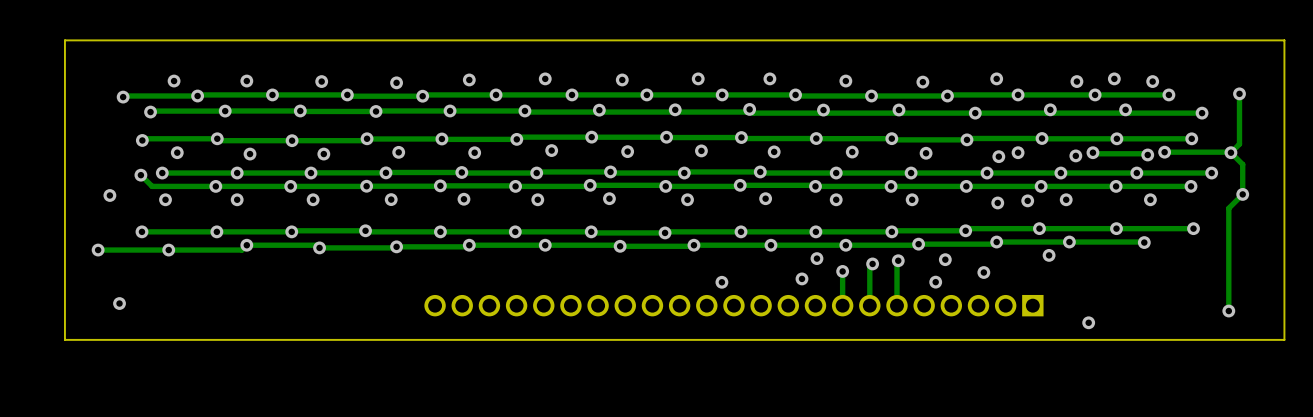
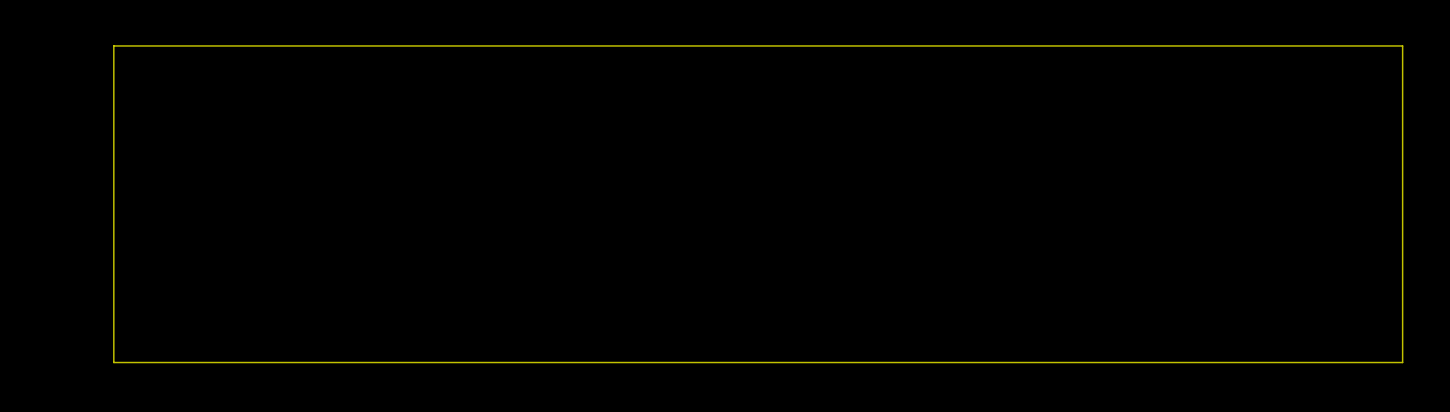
via: (545, 78) -> none
via: (698, 78) -> none
via: (769, 78) -> none
via: (996, 78) -> none
via: (1114, 78) -> none
via: (469, 79) -> none
via: (622, 79) -> none
via: (174, 81) -> none
via: (246, 81) -> none
via: (321, 81) -> none
via: (845, 81) -> none
via: (1076, 81) -> none
via: (1152, 81) -> none
via: (396, 82) -> none
via: (922, 82) -> none
track: (1239, 93) (1239, 144) (1230, 152) -> none
via: (1239, 93) -> none
via: (272, 94) -> none
via: (347, 94) -> none
via: (496, 94) -> none
via: (572, 94) -> none
via: (646, 94) -> none
via: (722, 94) -> none
via: (795, 94) -> none
via: (1018, 94) -> none
via: (1095, 94) -> none
track: (1168, 94) (198, 94) (123, 97) -> none
via: (1168, 94) -> none
via: (197, 96) -> none
via: (422, 96) -> none
via: (871, 96) -> none
via: (947, 96) -> none
via: (123, 97) -> none
via: (675, 109) -> none
via: (749, 109) -> none
via: (898, 109) -> none
via: (1050, 109) -> none
via: (1125, 109) -> none
via: (300, 110) -> none
via: (450, 110) -> none
via: (524, 110) -> none
via: (599, 110) -> none
via: (823, 110) -> none
via: (225, 111) -> none
via: (376, 111) -> none
track: (150, 112) (597, 112) (599, 110) (601, 112) (673, 112) (675, 109) (677, 112) (747, 112) (749, 109) (753, 113) (820, 113) (823, 110) (826, 113) (895, 113) (898, 109) (902, 113) (1047, 113) (1050, 109) (1053, 113) (1122, 113) (1125, 109) (1128, 113) (1202, 113) -> none
via: (150, 112) -> none
via: (975, 113) -> none
via: (1202, 113) -> none
track: (591, 137) (519, 137) (516, 139) (367, 138) -> none
track: (591, 137) (893, 139) (1191, 138) -> none
via: (591, 137) -> none
via: (666, 137) -> none
via: (741, 137) -> none
via: (217, 138) -> none
track: (367, 138) (363, 140) (219, 140) (217, 138) (144, 138) (142, 140) -> none
via: (367, 138) -> none
via: (441, 138) -> none
via: (816, 138) -> none
via: (891, 138) -> none
via: (1042, 138) -> none
via: (1116, 138) -> none
via: (1191, 138) -> none
via: (516, 139) -> none
via: (966, 139) -> none
via: (142, 140) -> none
via: (292, 140) -> none
via: (551, 150) -> none
via: (701, 150) -> none
via: (627, 151) -> none
via: (774, 151) -> none
via: (177, 152) -> none
via: (398, 152) -> none
via: (474, 152) -> none
via: (852, 152) -> none
via: (1018, 152) -> none
track: (1092, 152) (1147, 154) -> none
via: (1092, 152) -> none
track: (1164, 152) (1230, 152) (1242, 164) (1242, 194) (1228, 208) (1228, 311) -> none
via: (1164, 152) -> none
via: (1230, 152) -> none
via: (926, 153) -> none
via: (250, 154) -> none
via: (323, 154) -> none
via: (1147, 154) -> none
via: (1075, 155) -> none
via: (998, 156) -> none
via: (610, 171) -> none
via: (760, 171) -> none
track: (311, 172) (1211, 173) -> none
via: (385, 172) -> none
via: (461, 172) -> none
via: (162, 173) -> none
via: (237, 173) -> none
track: (310, 173) (162, 173) -> none
via: (310, 173) -> none
via: (536, 173) -> none
via: (684, 173) -> none
via: (836, 173) -> none
via: (911, 173) -> none
via: (987, 173) -> none
via: (1060, 173) -> none
via: (1136, 173) -> none
via: (1211, 173) -> none
track: (140, 175) (152, 186) (290, 186) -> none
via: (140, 175) -> none
via: (440, 185) -> none
via: (590, 185) -> none
via: (740, 185) -> none
via: (215, 186) -> none
track: (290, 186) (1041, 186) -> none
via: (290, 186) -> none
via: (366, 186) -> none
via: (515, 186) -> none
via: (665, 186) -> none
via: (815, 186) -> none
via: (891, 186) -> none
via: (966, 186) -> none
via: (1041, 186) -> none
track: (1116, 186) (1041, 186) -> none
via: (1116, 186) -> none
track: (1191, 186) (1116, 186) -> none
via: (1191, 186) -> none
via: (1242, 194) -> none
via: (109, 195) -> none
via: (609, 198) -> none
via: (765, 198) -> none
via: (165, 199) -> none
via: (237, 199) -> none
via: (313, 199) -> none
via: (391, 199) -> none
via: (463, 199) -> none
via: (537, 199) -> none
via: (687, 199) -> none
via: (836, 199) -> none
via: (912, 199) -> none
via: (1066, 199) -> none
via: (1150, 199) -> none
via: (1027, 200) -> none
via: (997, 202) -> none
via: (1039, 228) -> none
via: (1116, 228) -> none
track: (1193, 228) (967, 228) (965, 230) (891, 231) (665, 232) (365, 230) (141, 231) -> none
via: (1193, 228) -> none
via: (365, 230) -> none
via: (965, 230) -> none
via: (141, 231) -> none
via: (216, 231) -> none
via: (291, 231) -> none
via: (440, 231) -> none
via: (515, 231) -> none
via: (591, 231) -> none
via: (741, 231) -> none
via: (815, 231) -> none
via: (891, 231) -> none
via: (665, 232) -> none
via: (996, 242) -> none
via: (1069, 242) -> none
track: (1144, 242) (996, 242) (994, 244) (692, 246) (469, 245) (467, 246) (395, 247) (246, 245) (242, 250) (98, 250) -> none
via: (1144, 242) -> none
via: (918, 244) -> none
via: (246, 245) -> none
via: (469, 245) -> none
via: (545, 245) -> none
via: (693, 245) -> none
via: (770, 245) -> none
via: (845, 245) -> none
via: (396, 246) -> none
via: (620, 246) -> none
via: (319, 247) -> none
via: (98, 250) -> none
via: (168, 250) -> none
via: (1049, 255) -> none
via: (816, 258) -> none
via: (945, 259) -> none
track: (898, 260) (896, 305) -> none
via: (898, 260) -> none
track: (872, 263) (869, 266) (869, 305) -> none
via: (872, 263) -> none
track: (842, 271) (842, 305) -> none
via: (842, 271) -> none
via: (983, 272) -> none
via: (801, 278) -> none
via: (721, 282) -> none
via: (935, 282) -> none
via: (119, 303) -> none
part: (733, 305) -> none
via: (1228, 311) -> none
via: (1088, 322) -> none

